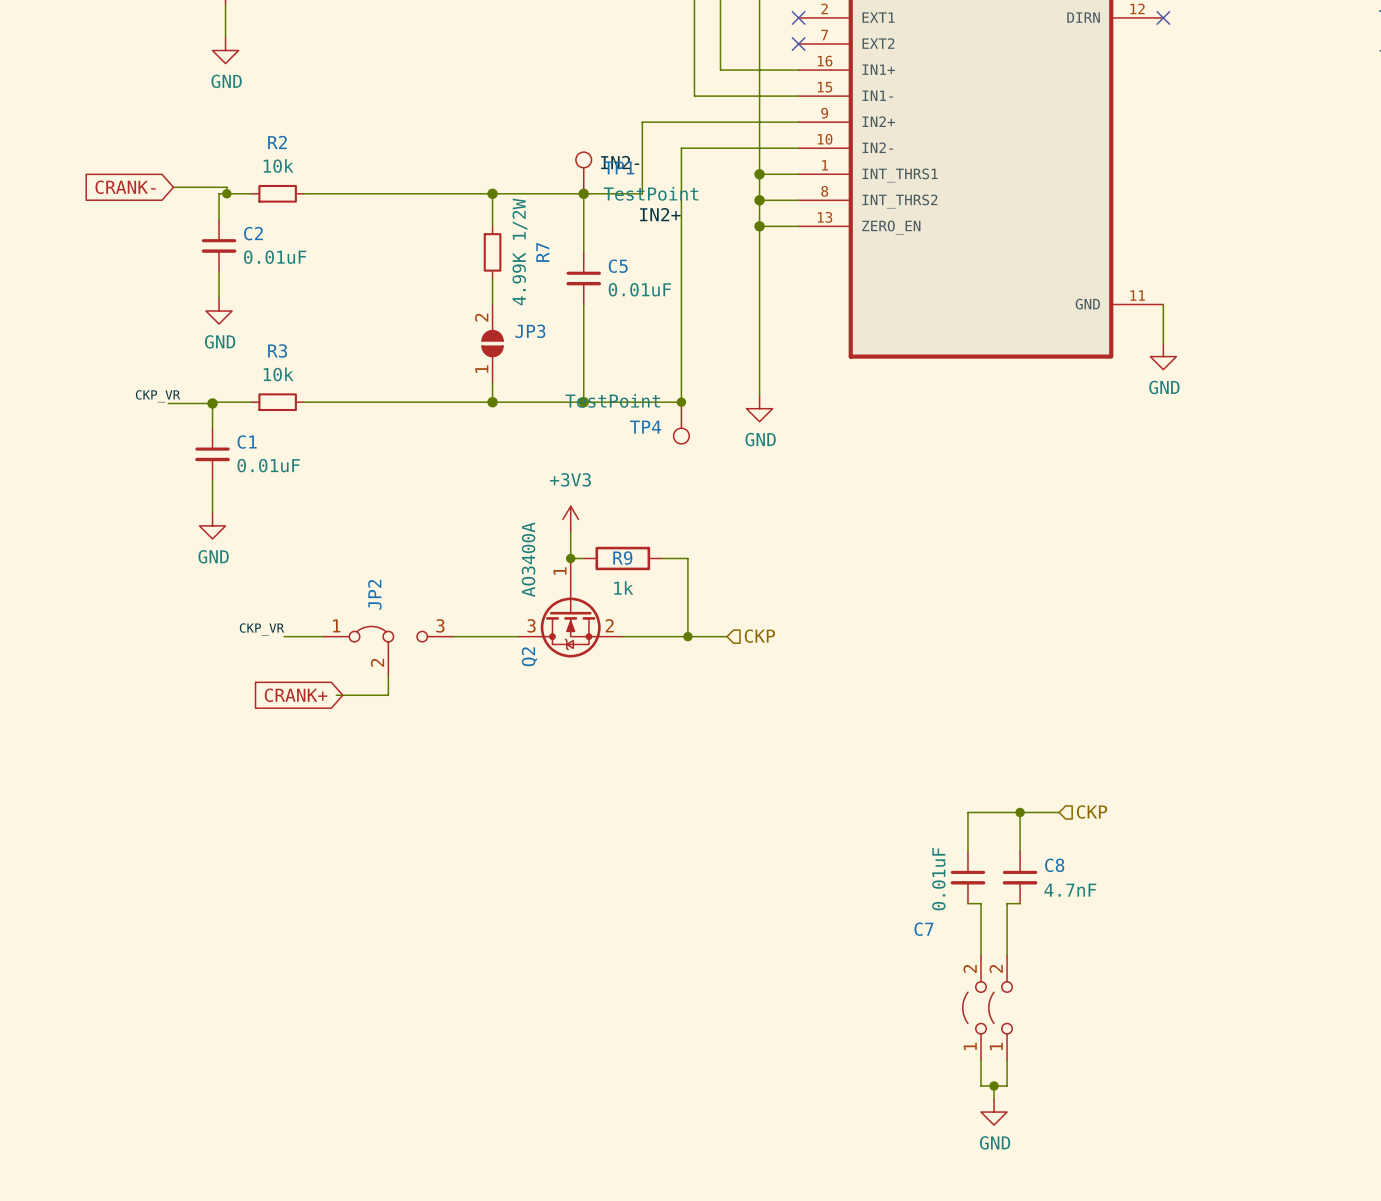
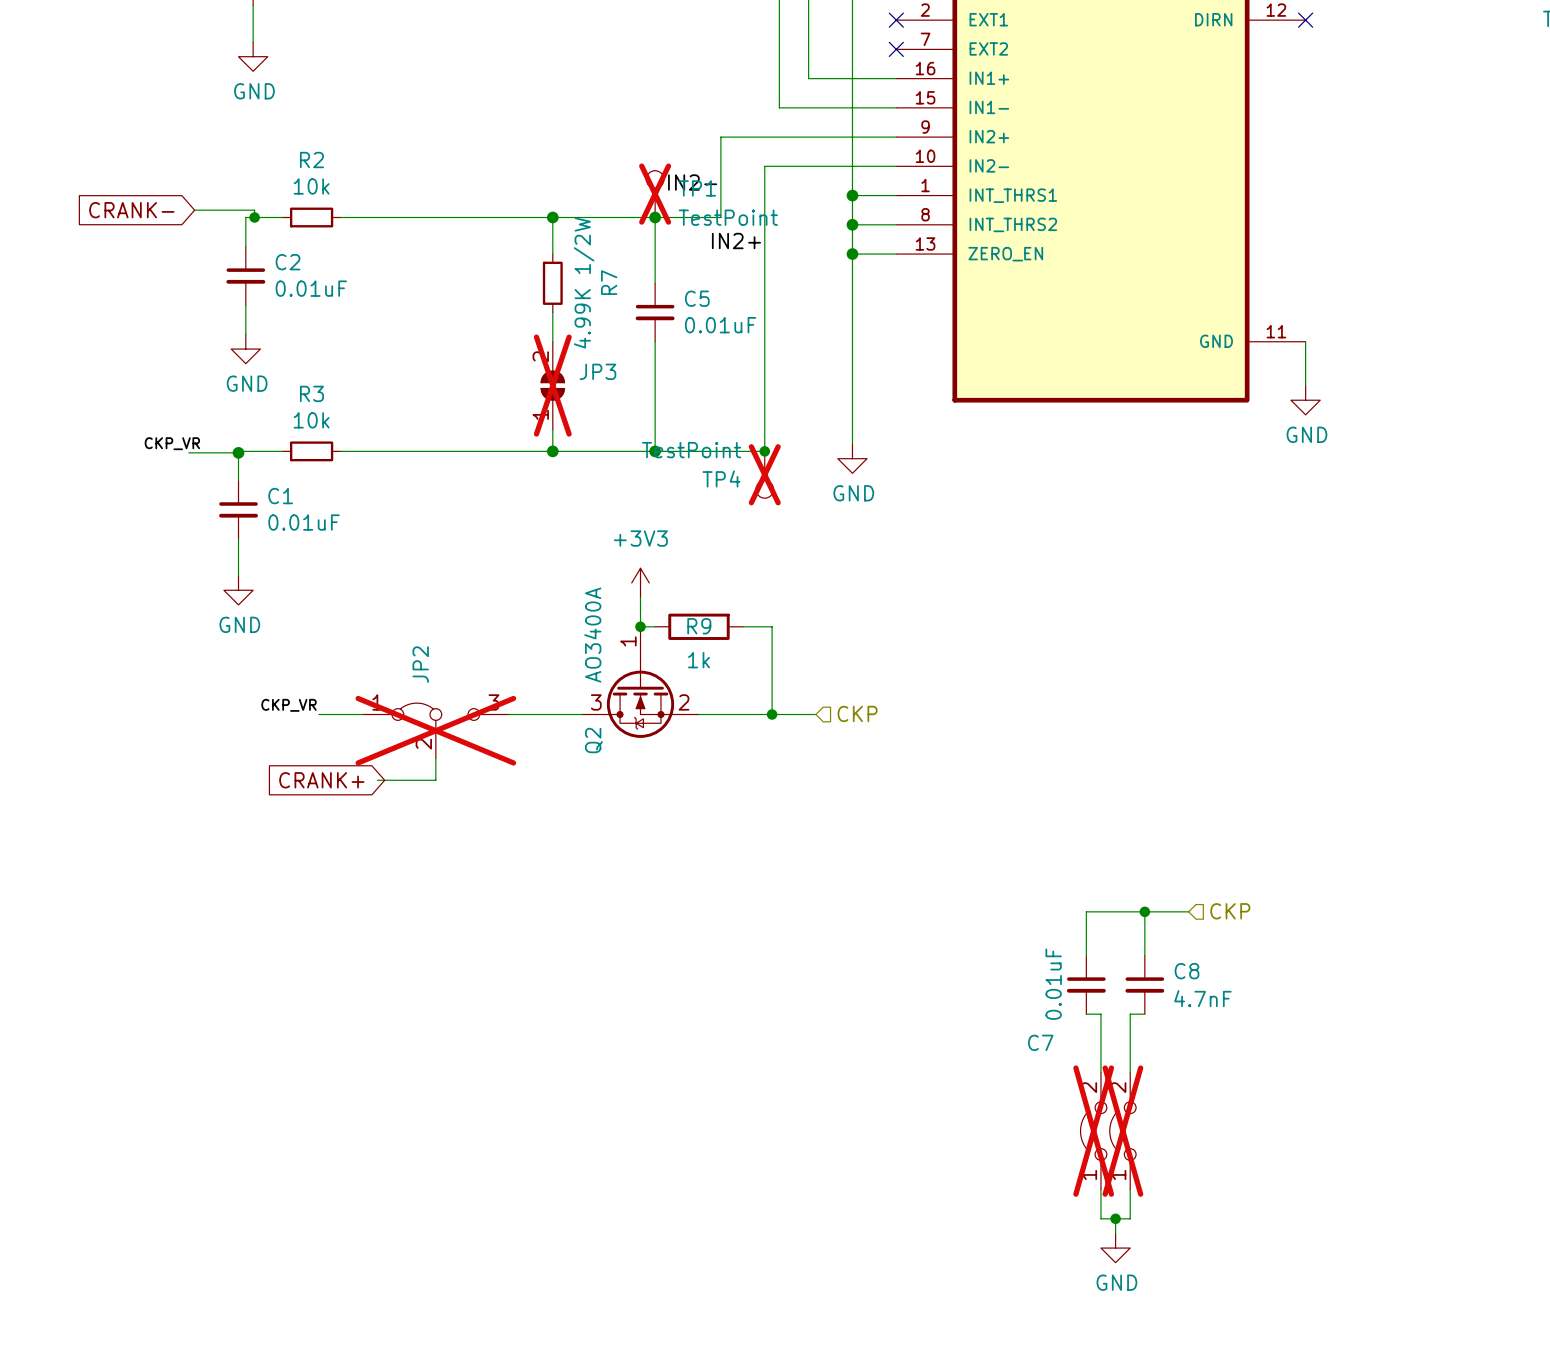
TP1 do-not-place cross: none -> (655, 194)
JP3 do-not-place cross: none -> (552, 385)
TP4 do-not-place cross: none -> (764, 474)
JP2 do-not-place cross: none -> (435, 730)
part do-not-place cross: none -> (1093, 1131)
part do-not-place cross: none -> (1122, 1131)

